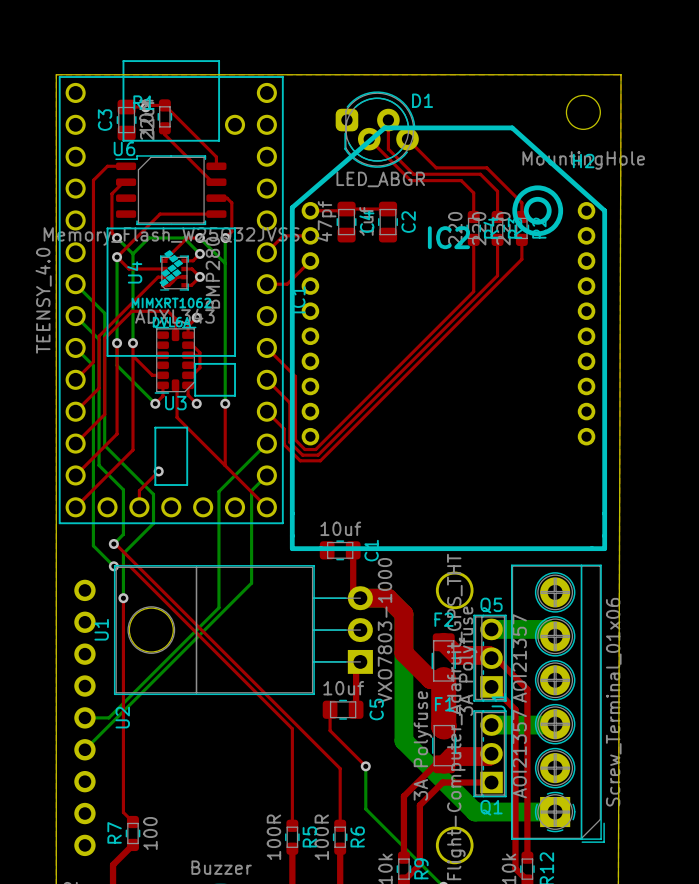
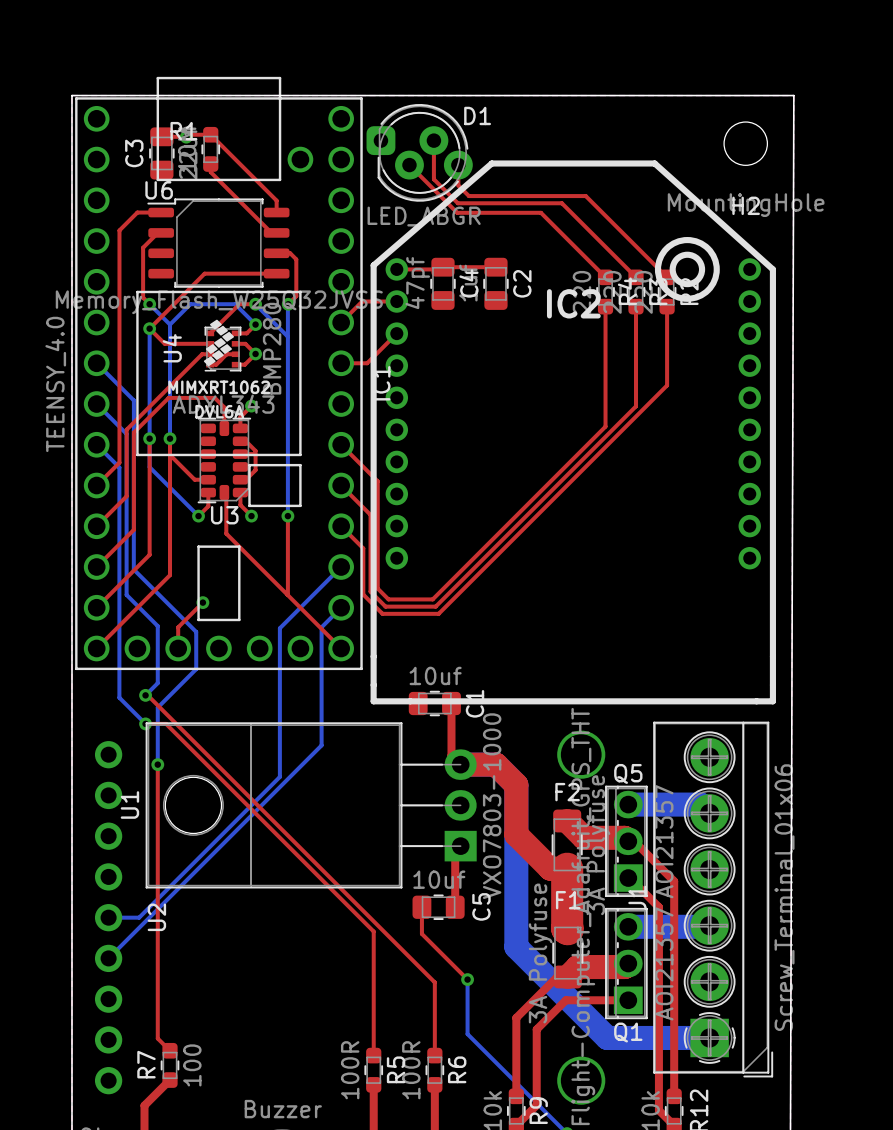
top track: (388, 120) (388, 149) (413, 174) (480, 174) (497, 191) (497, 216) -> (433, 140) (433, 179) (457, 203) (561, 203) (636, 277)
D1 position: (377, 129) -> (419, 152)
top track: (369, 139) (410, 180) (461, 180) (473, 193) (473, 216) -> (409, 165) (457, 212) (540, 212) (605, 277)
top track: (407, 139) (436, 167) (486, 167) (521, 202) (521, 216) -> (458, 165) (458, 185) (468, 196) (585, 196) (667, 277)
top track: (521, 259) (320, 460) (300, 460) (284, 444) -> (667, 331) (667, 385) (438, 613) (382, 613) (363, 594) (363, 568)
top track: (497, 275) (318, 455) (302, 455) (289, 442) -> (636, 352) (636, 406) (435, 606) (385, 606) (370, 591) (370, 565)
top track: (473, 291) (315, 449) (304, 449) (295, 440) -> (605, 372) (605, 426) (432, 599) (388, 599) (377, 588) (377, 562)

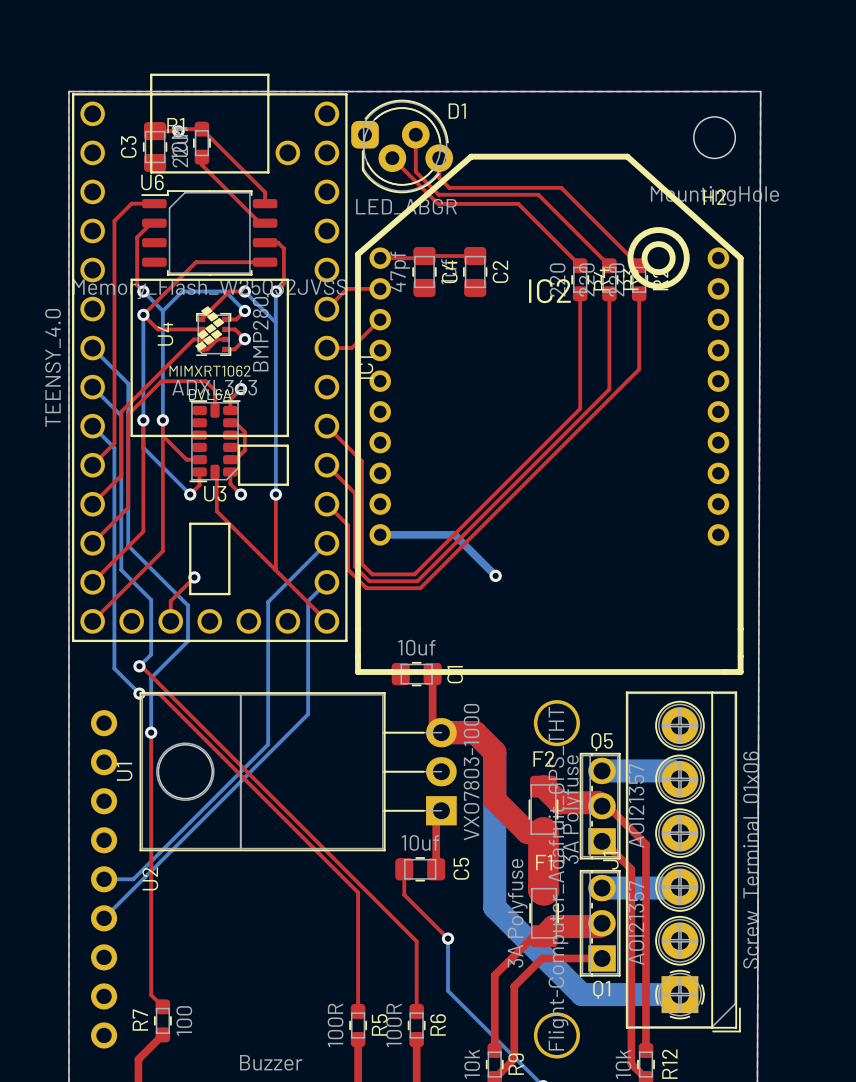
bottom track: none -> (380, 534) (454, 534) (495, 575)
via: none -> (495, 575)

